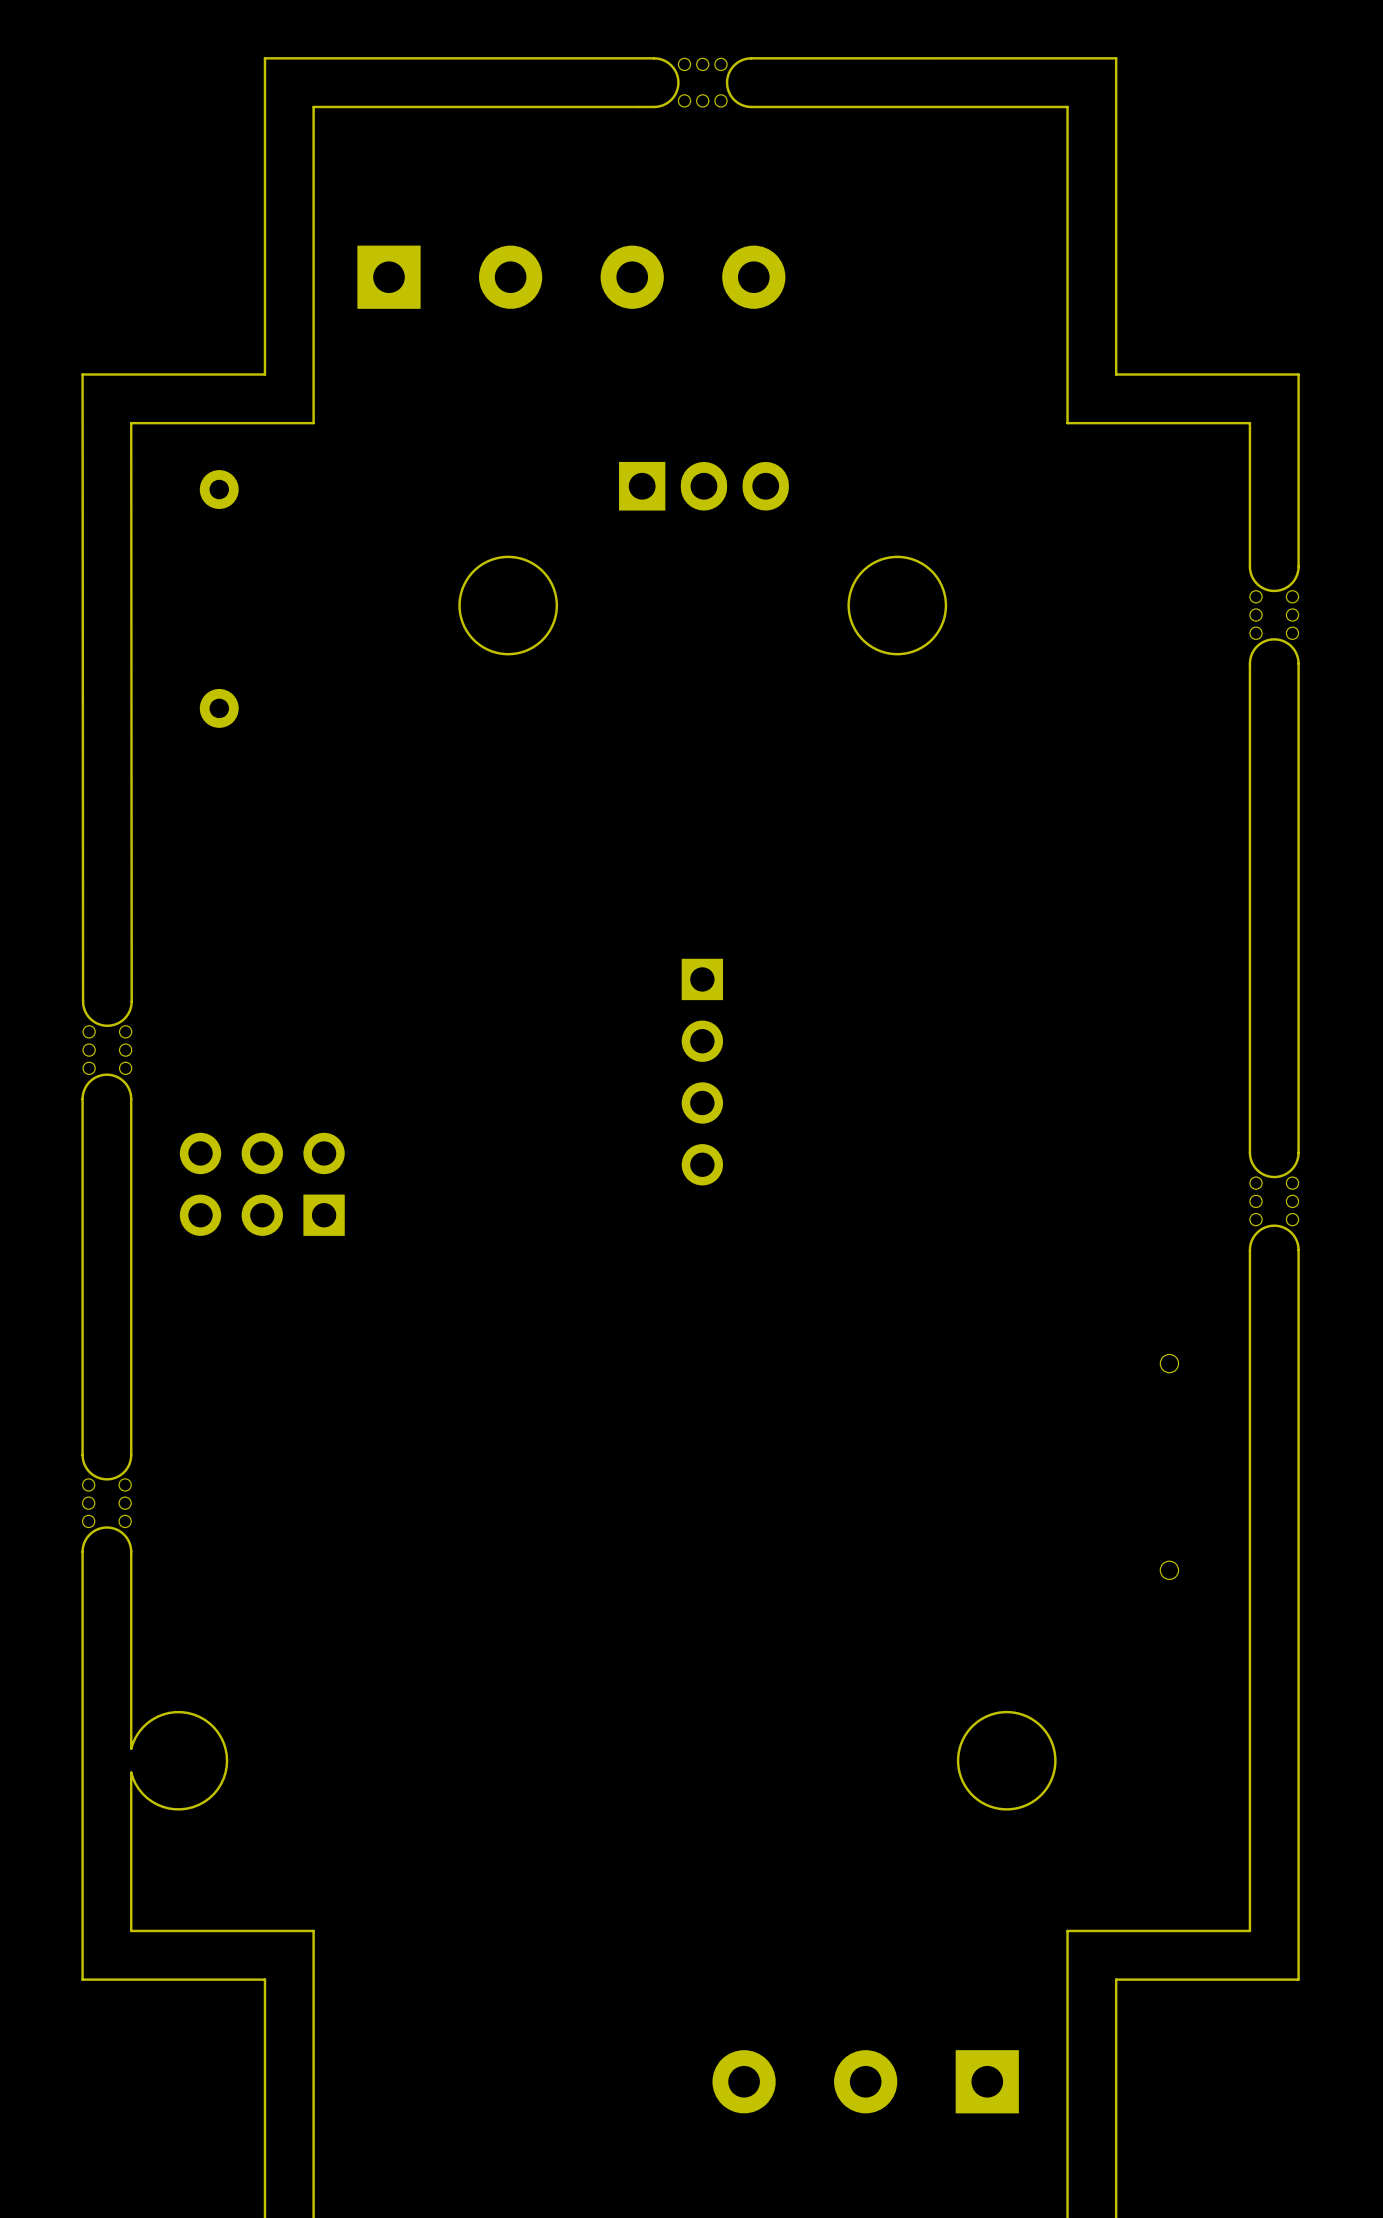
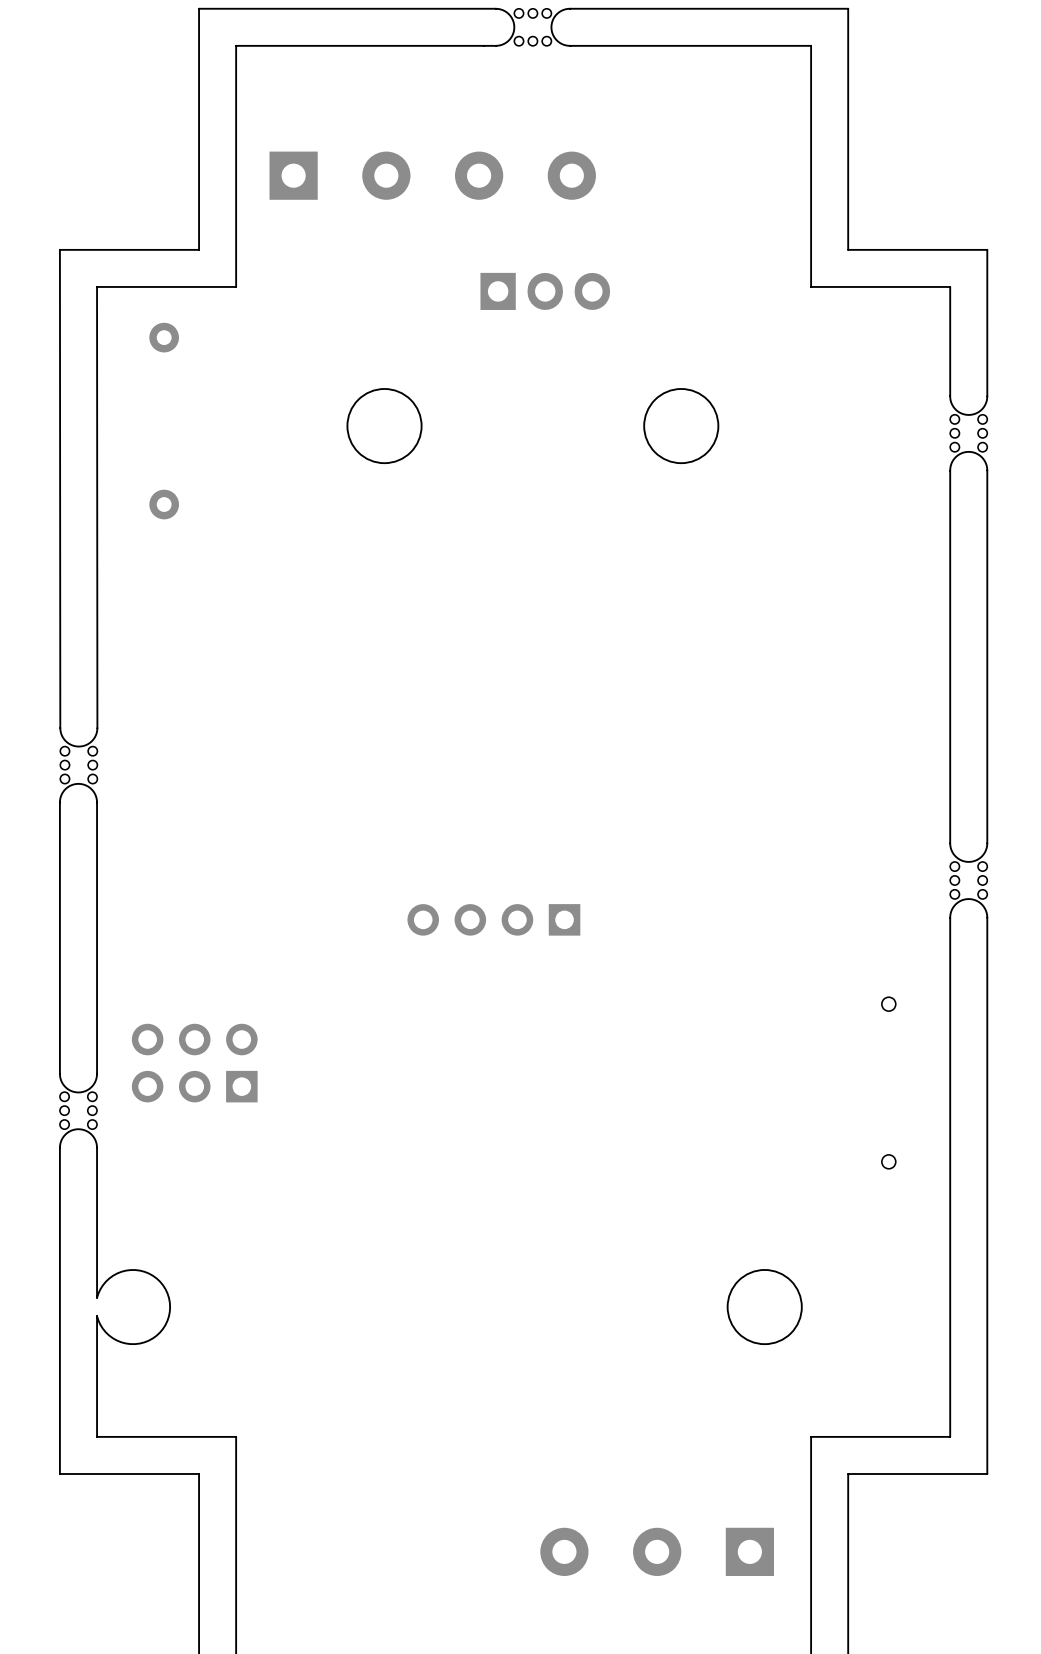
part position: (703, 486) -> (545, 291)
part rotation: 0° (702, 1072) -> 90° clockwise (493, 919)
part position: (702, 1072) -> (493, 919)
part position: (262, 1184) -> (194, 1063)

